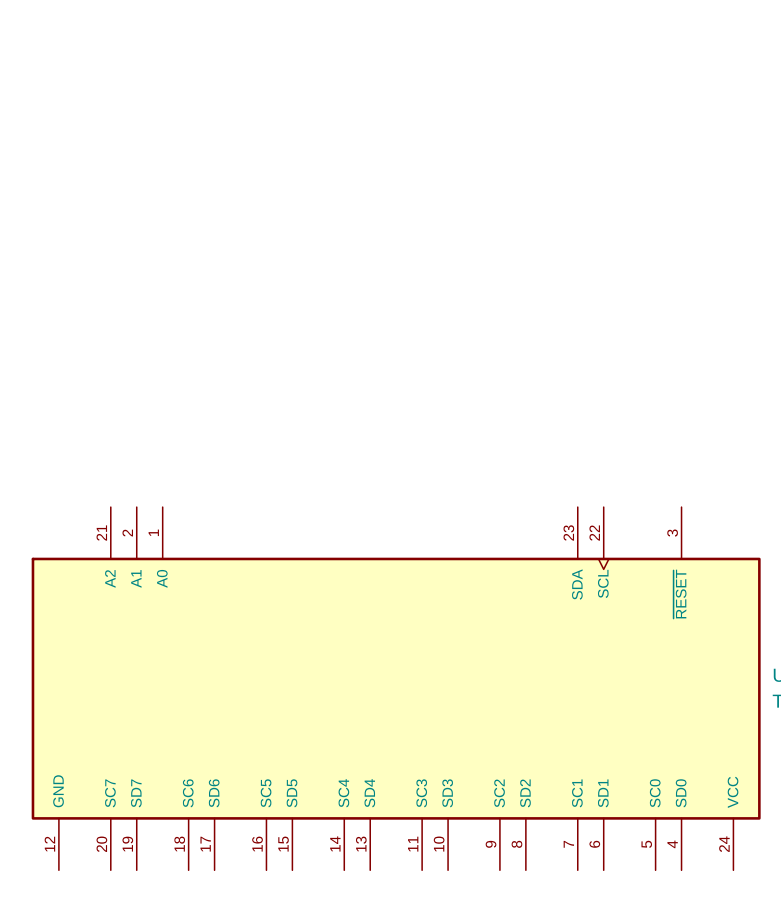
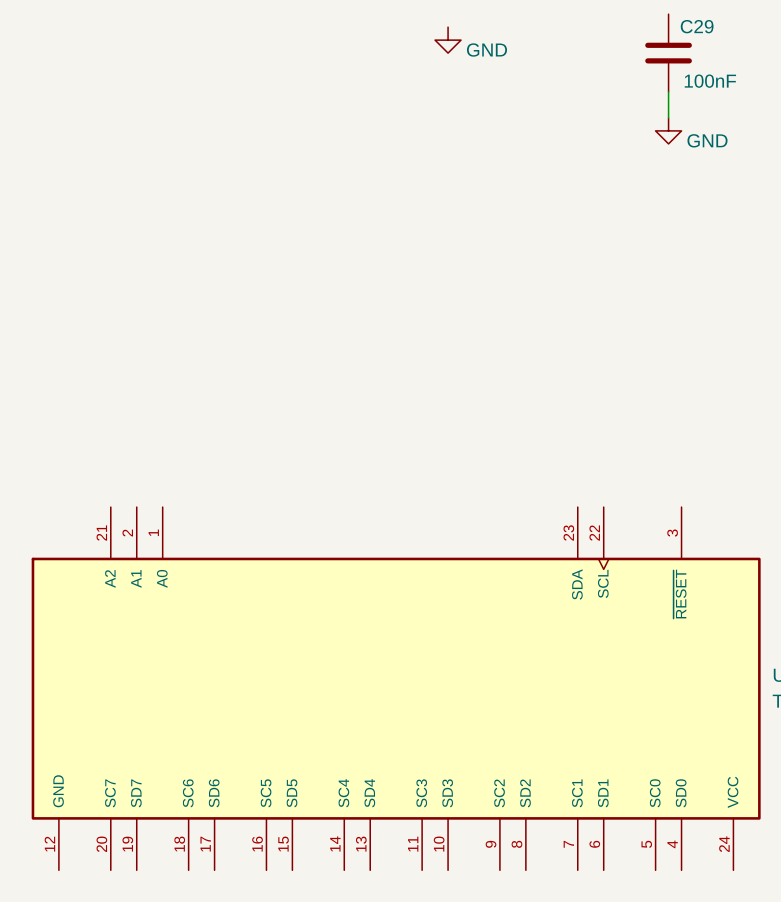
power symbol: none -> GND (448, 40)
C29: none -> 100nF (668, 53)
wire: none -> (668, 92) (668, 117)
power symbol: none -> GND (668, 130)

